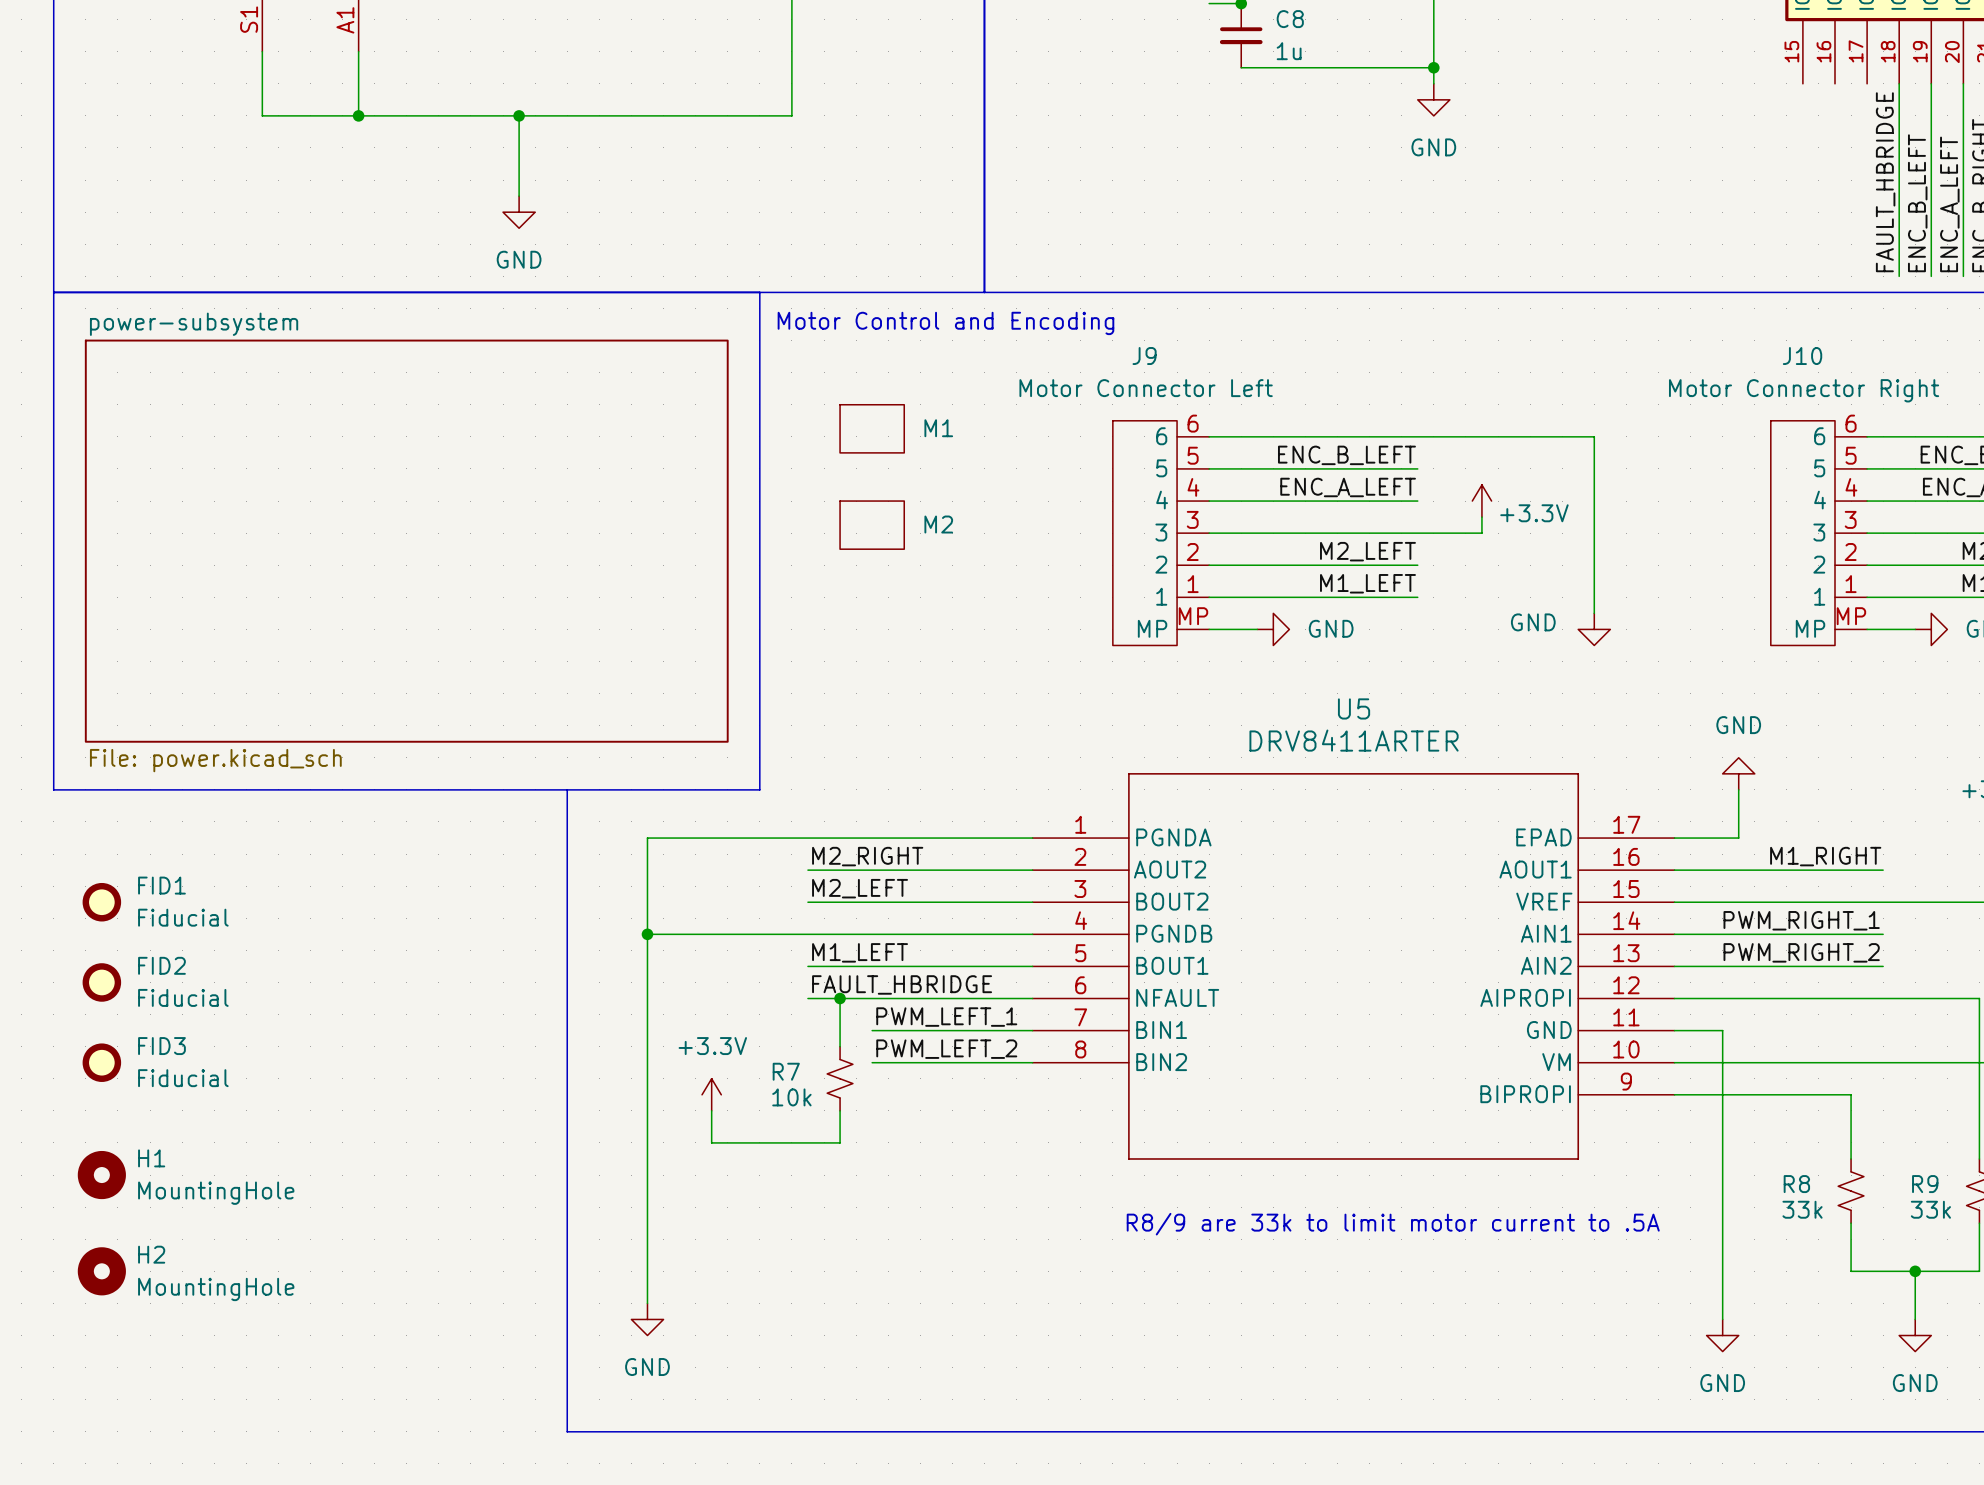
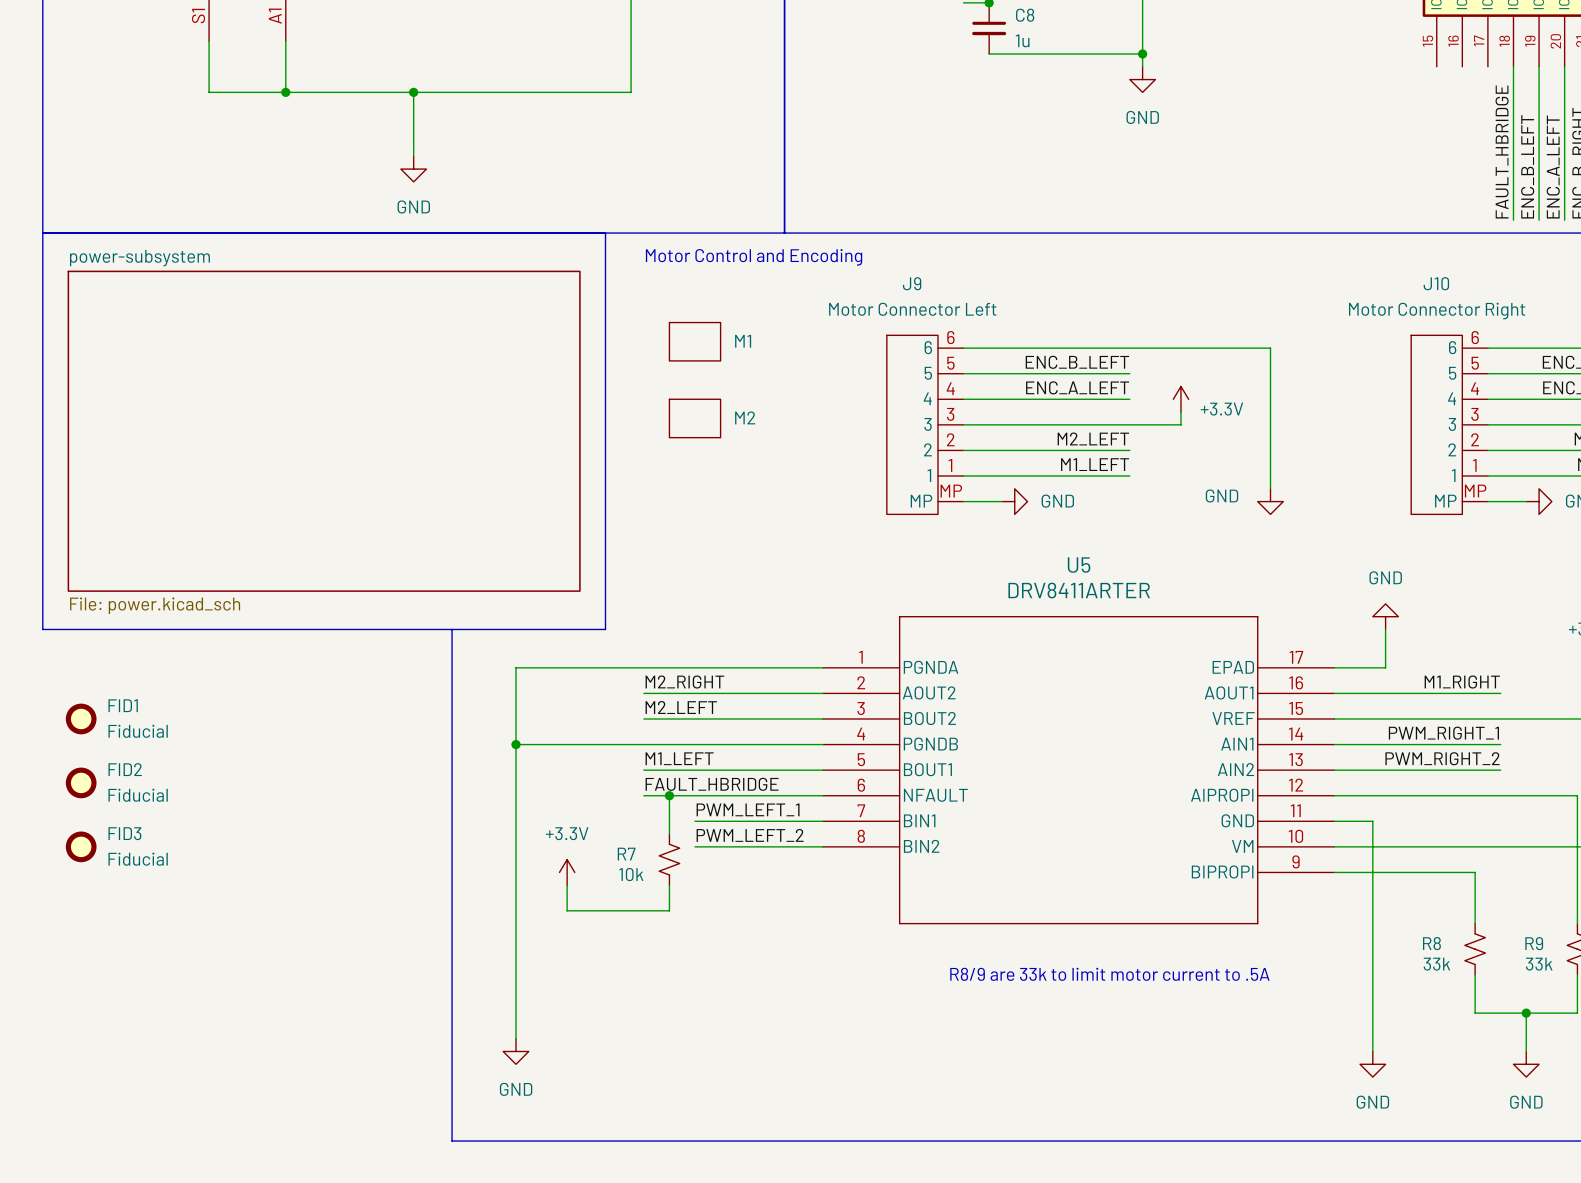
H1: MountingHole (101, 1175) -> none
H2: MountingHole (101, 1271) -> none

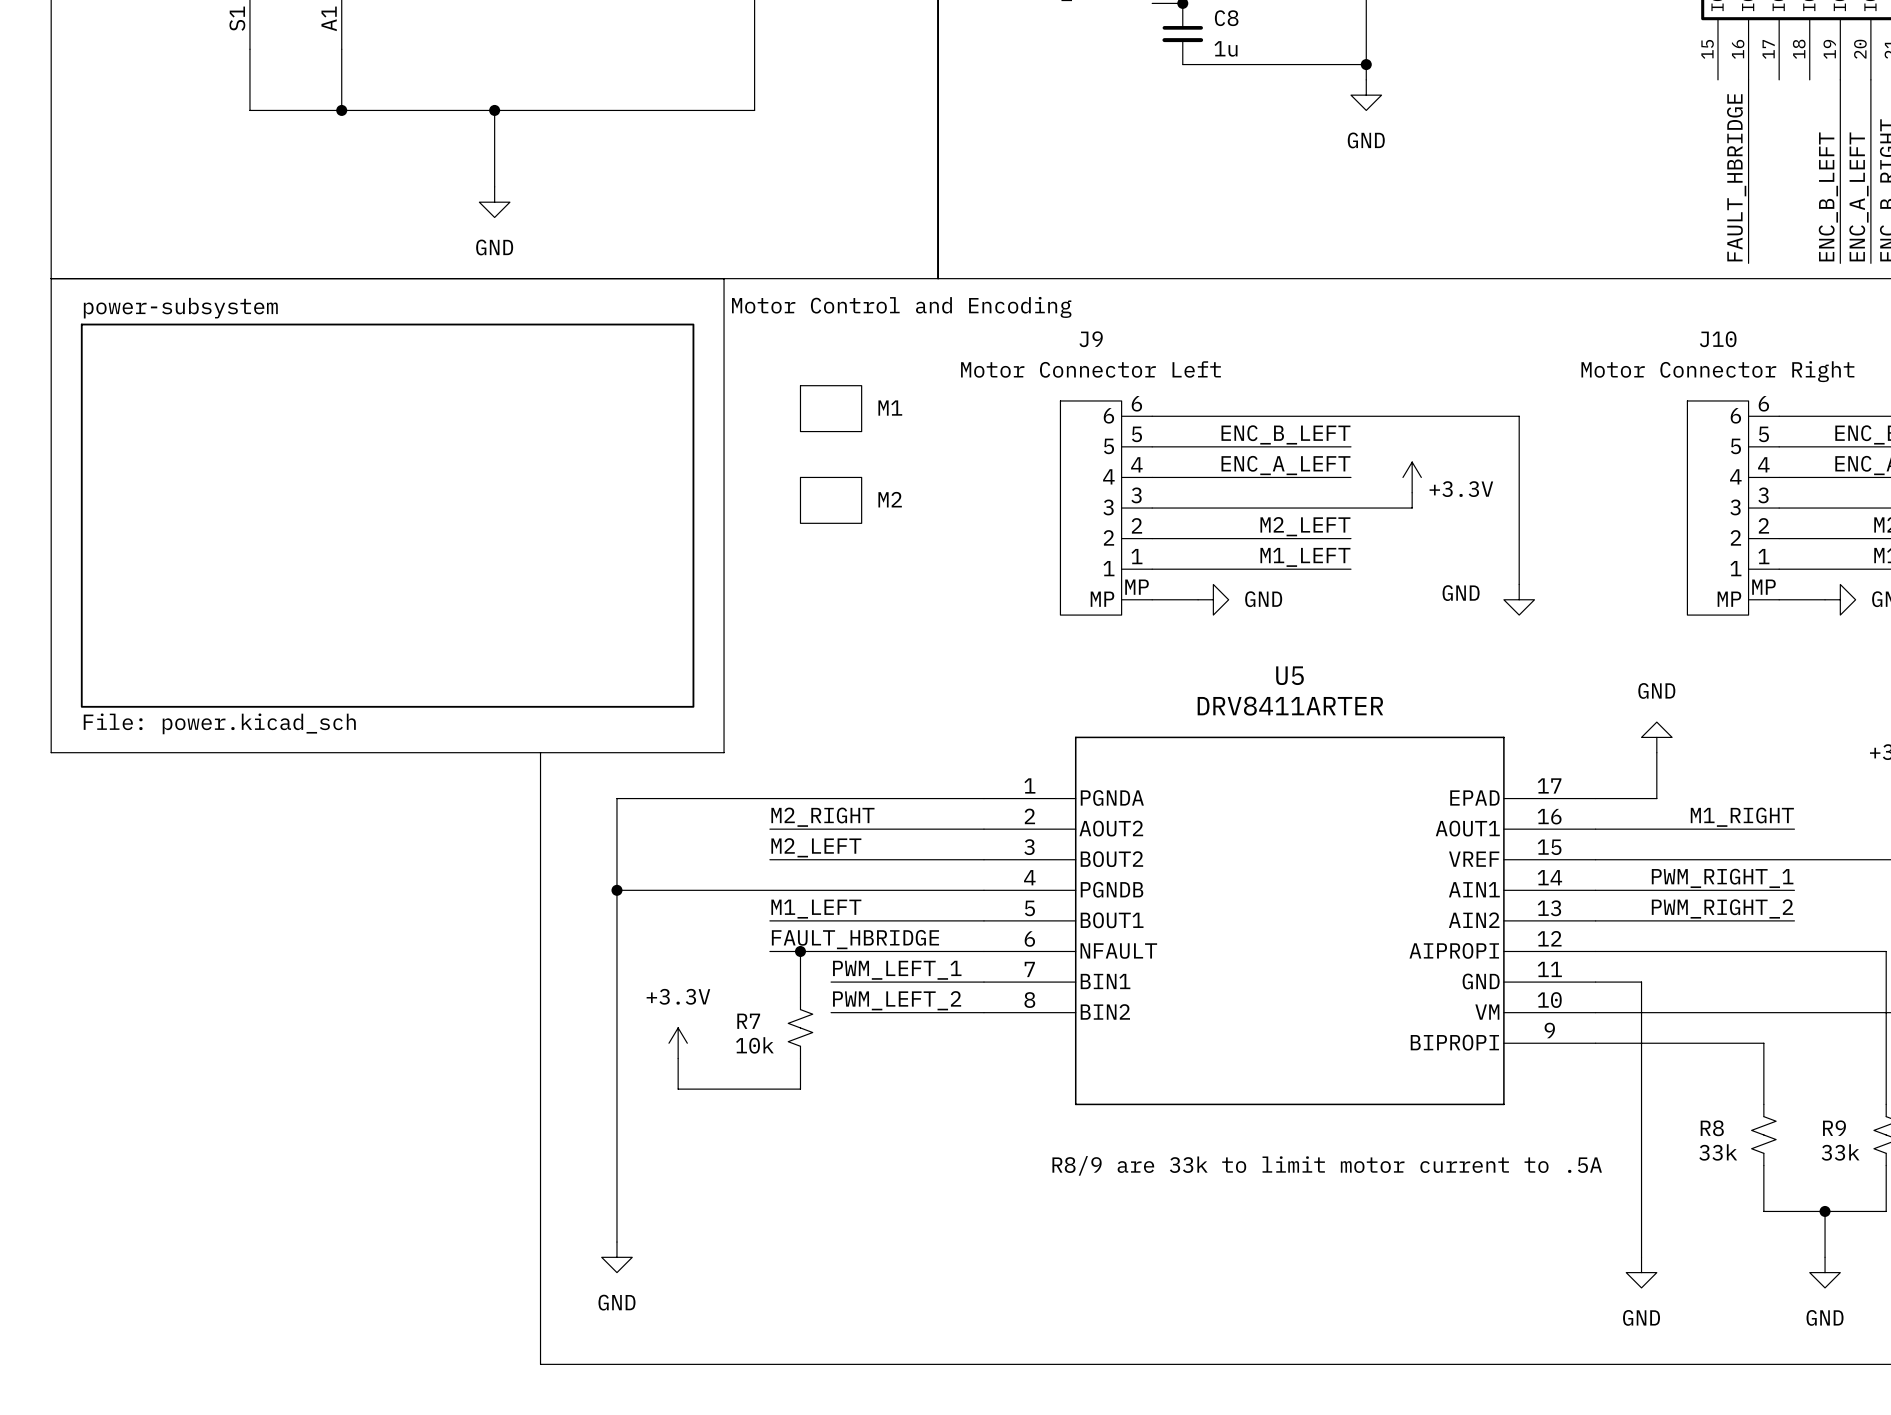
wire: (1513, 66) (1513, 220) -> (1748, 79) (1748, 263)
label position: FAULT_HBRIDGE (1502, 152) -> FAULT_HBRIDGE (1736, 177)
FID1: Fiducial (81, 718) -> none
FID2: Fiducial (81, 782) -> none
FID3: Fiducial (81, 846) -> none

